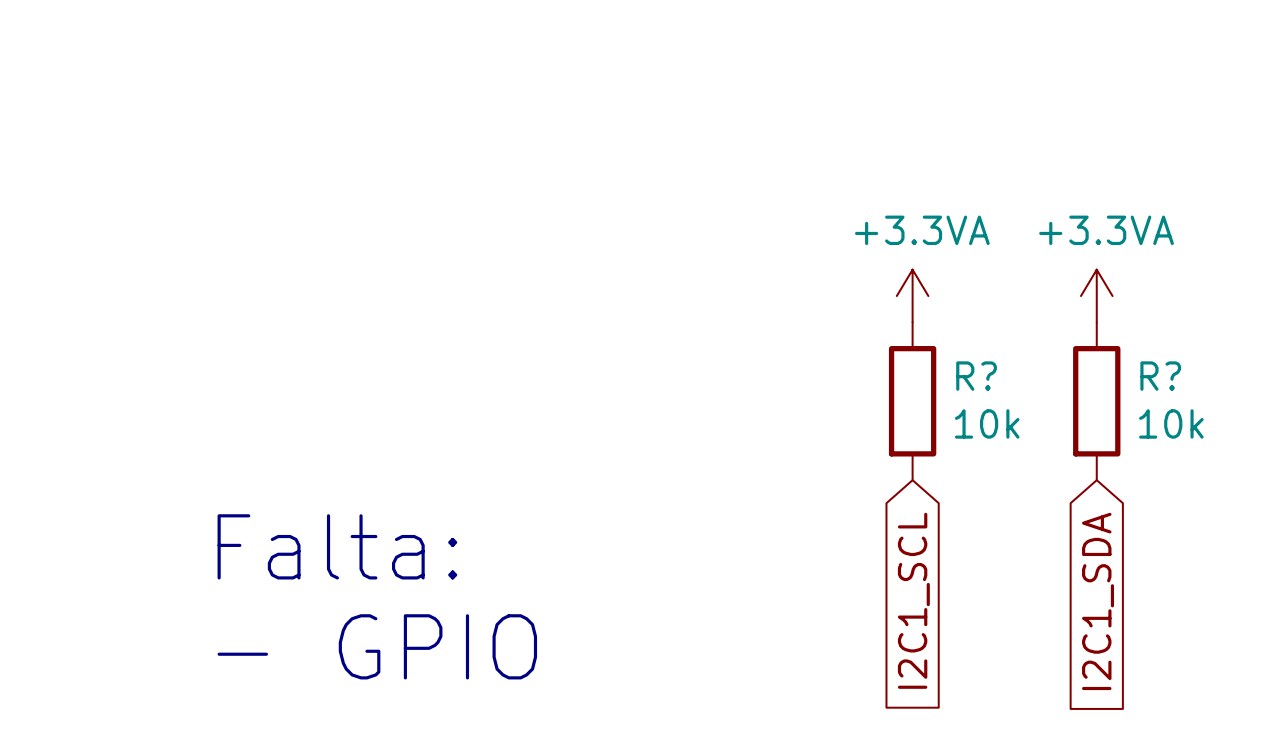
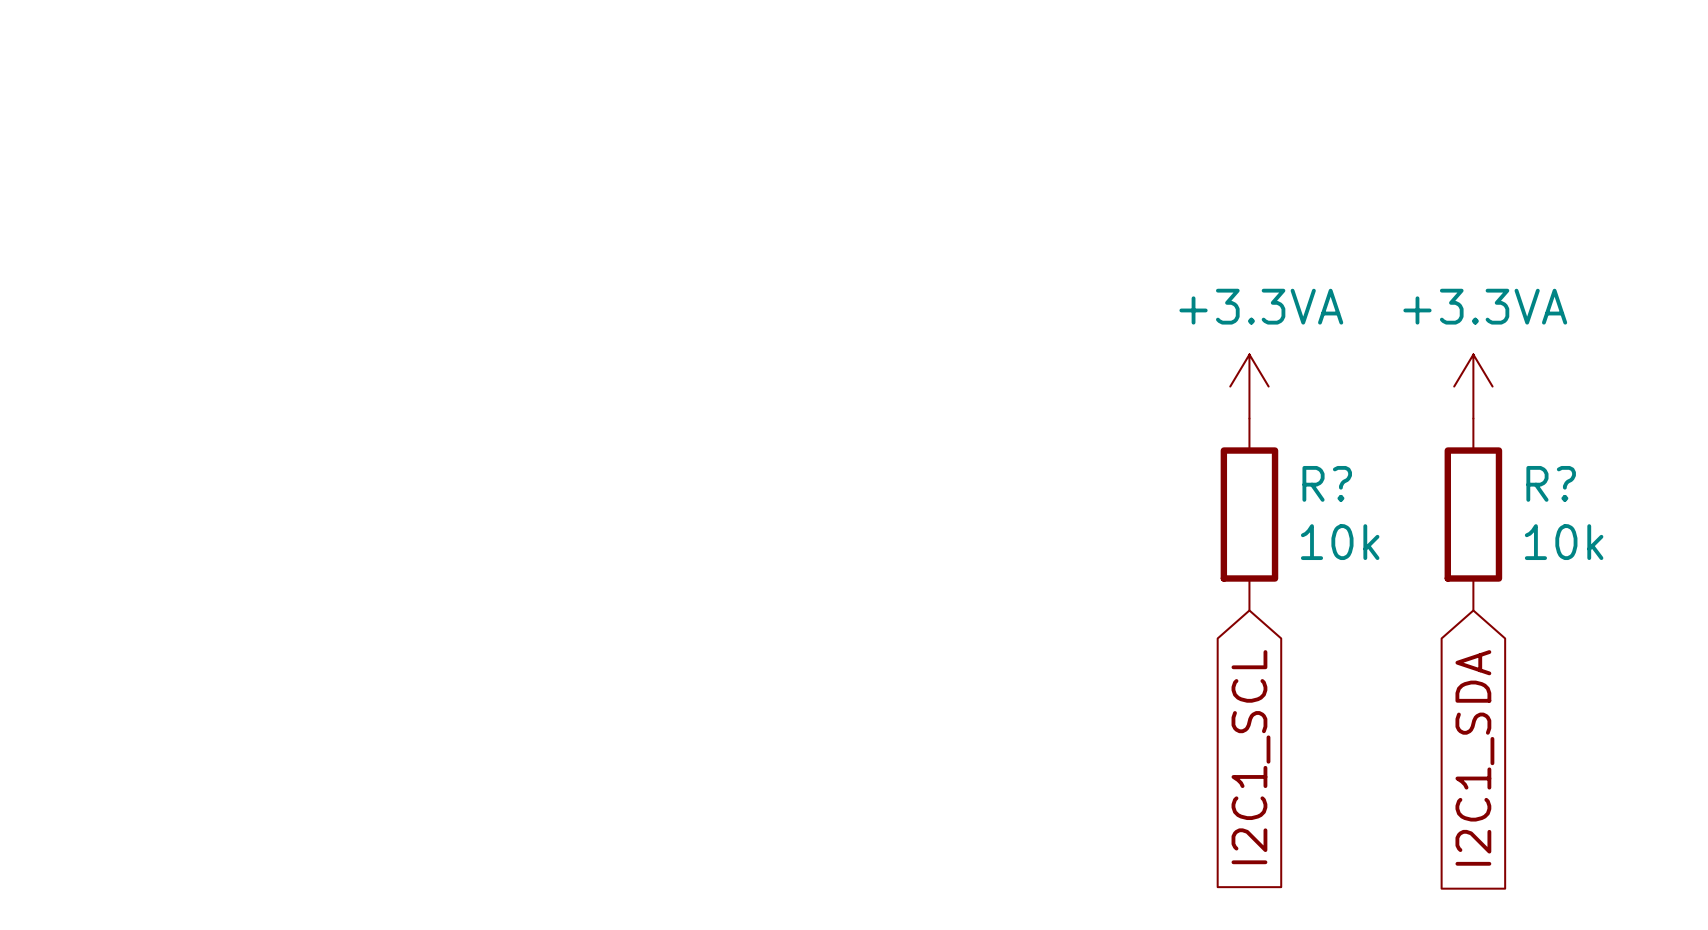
text: Falta: (337, 546) -> none
text: - GPIO (377, 646) -> none

